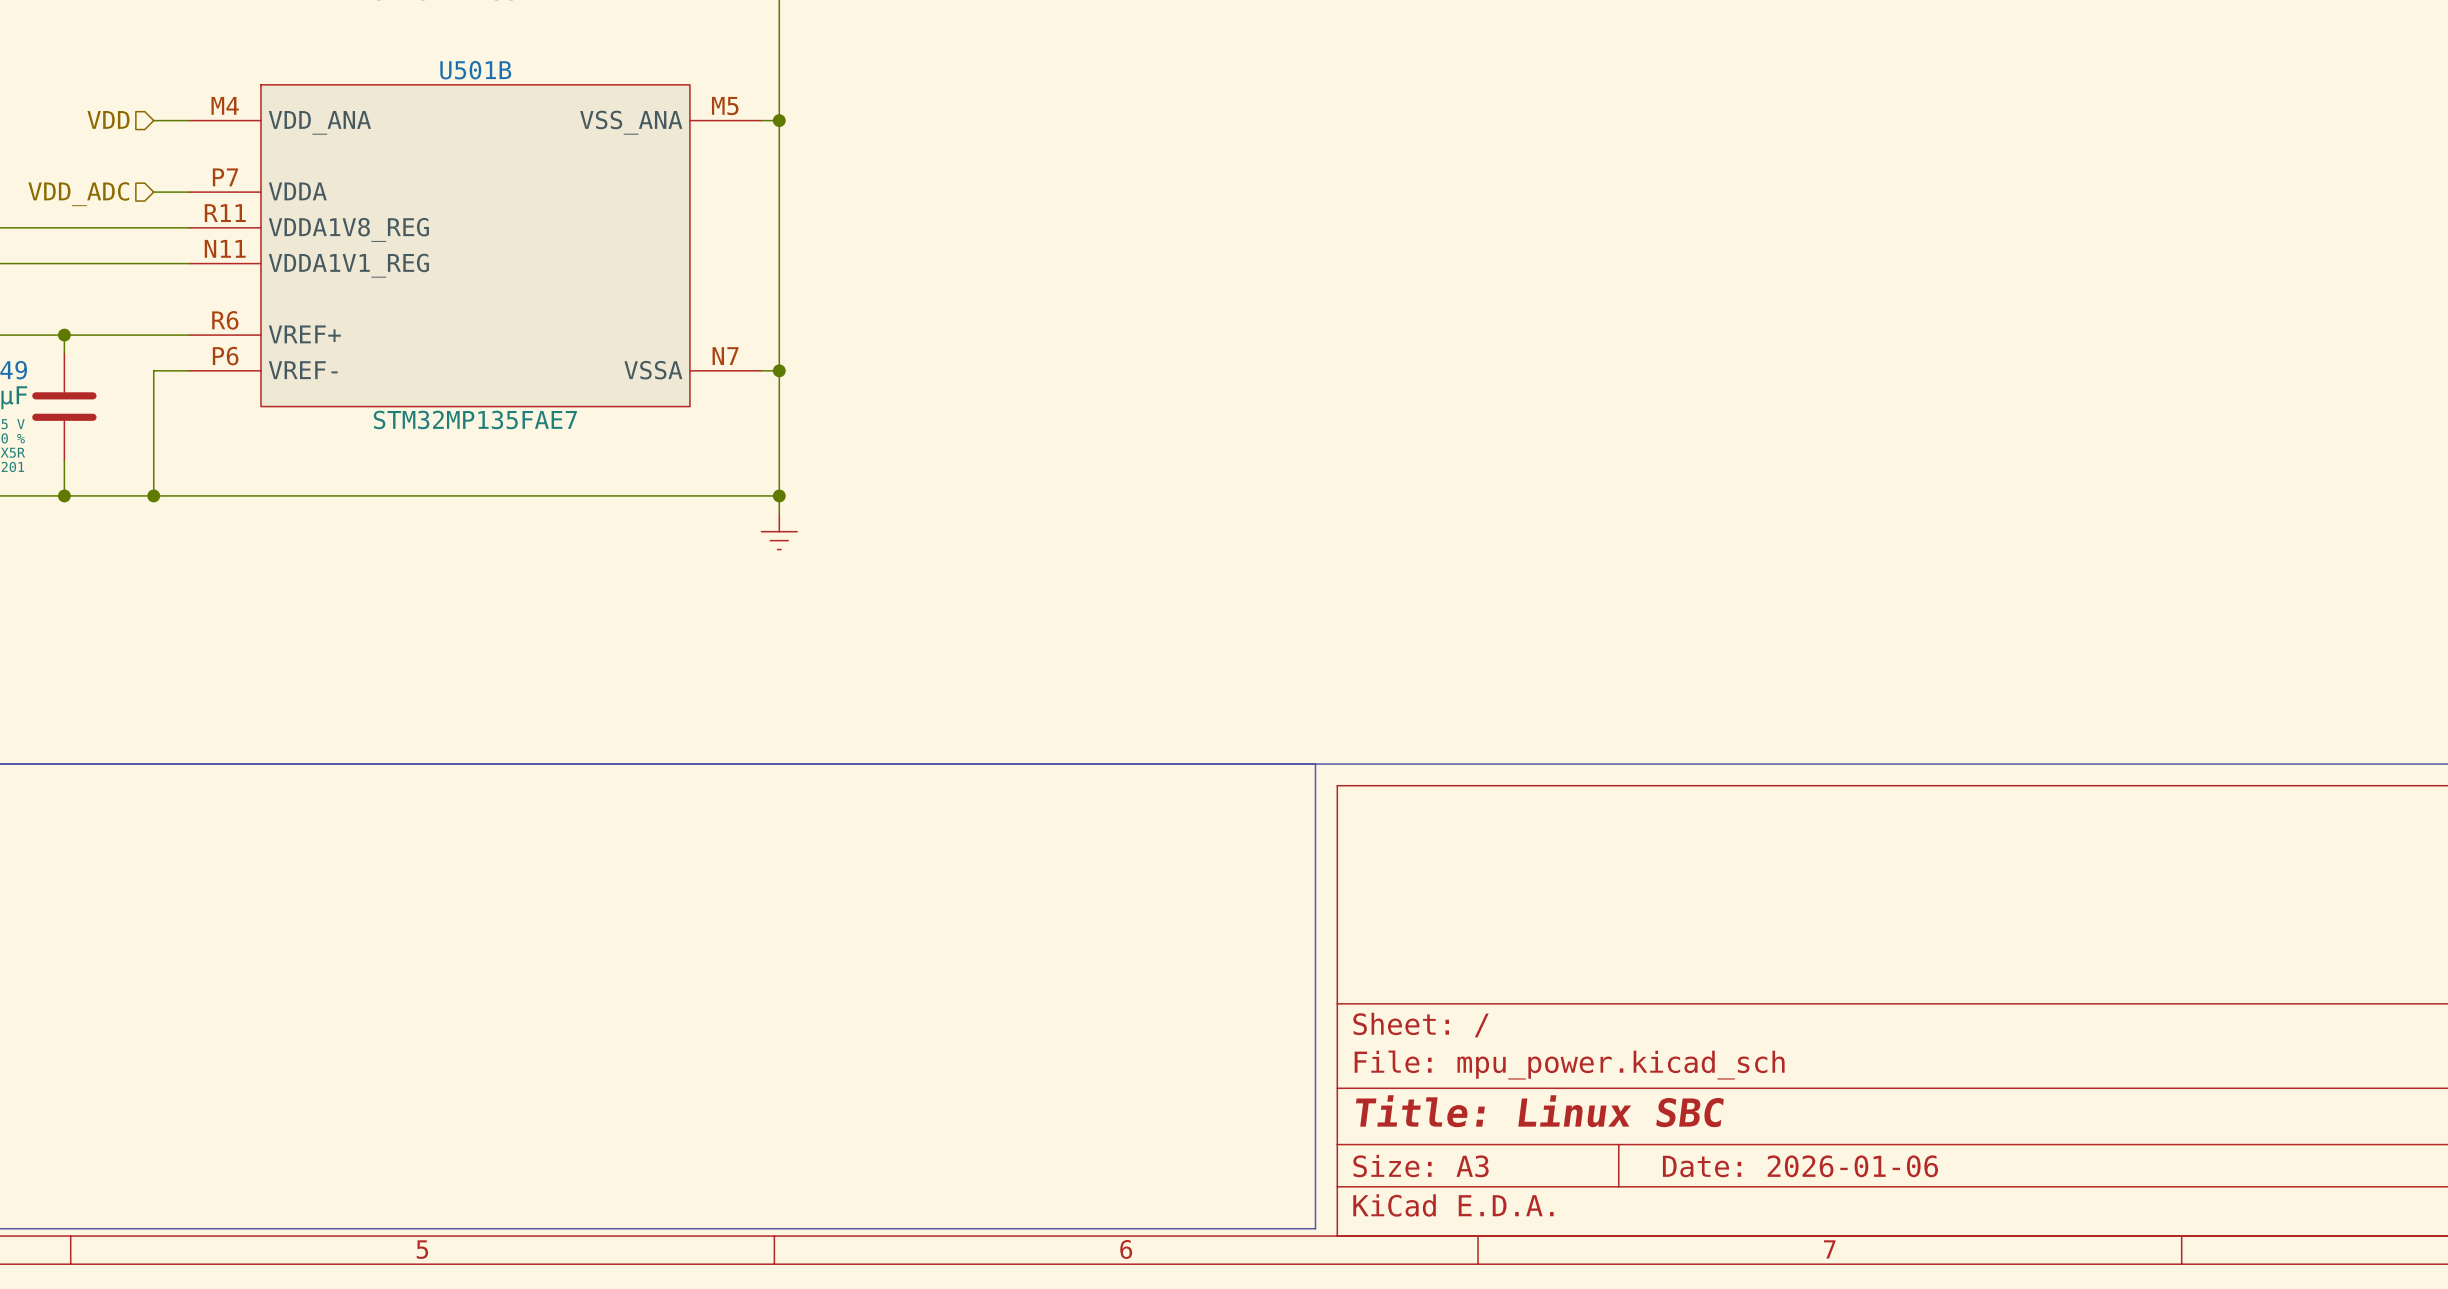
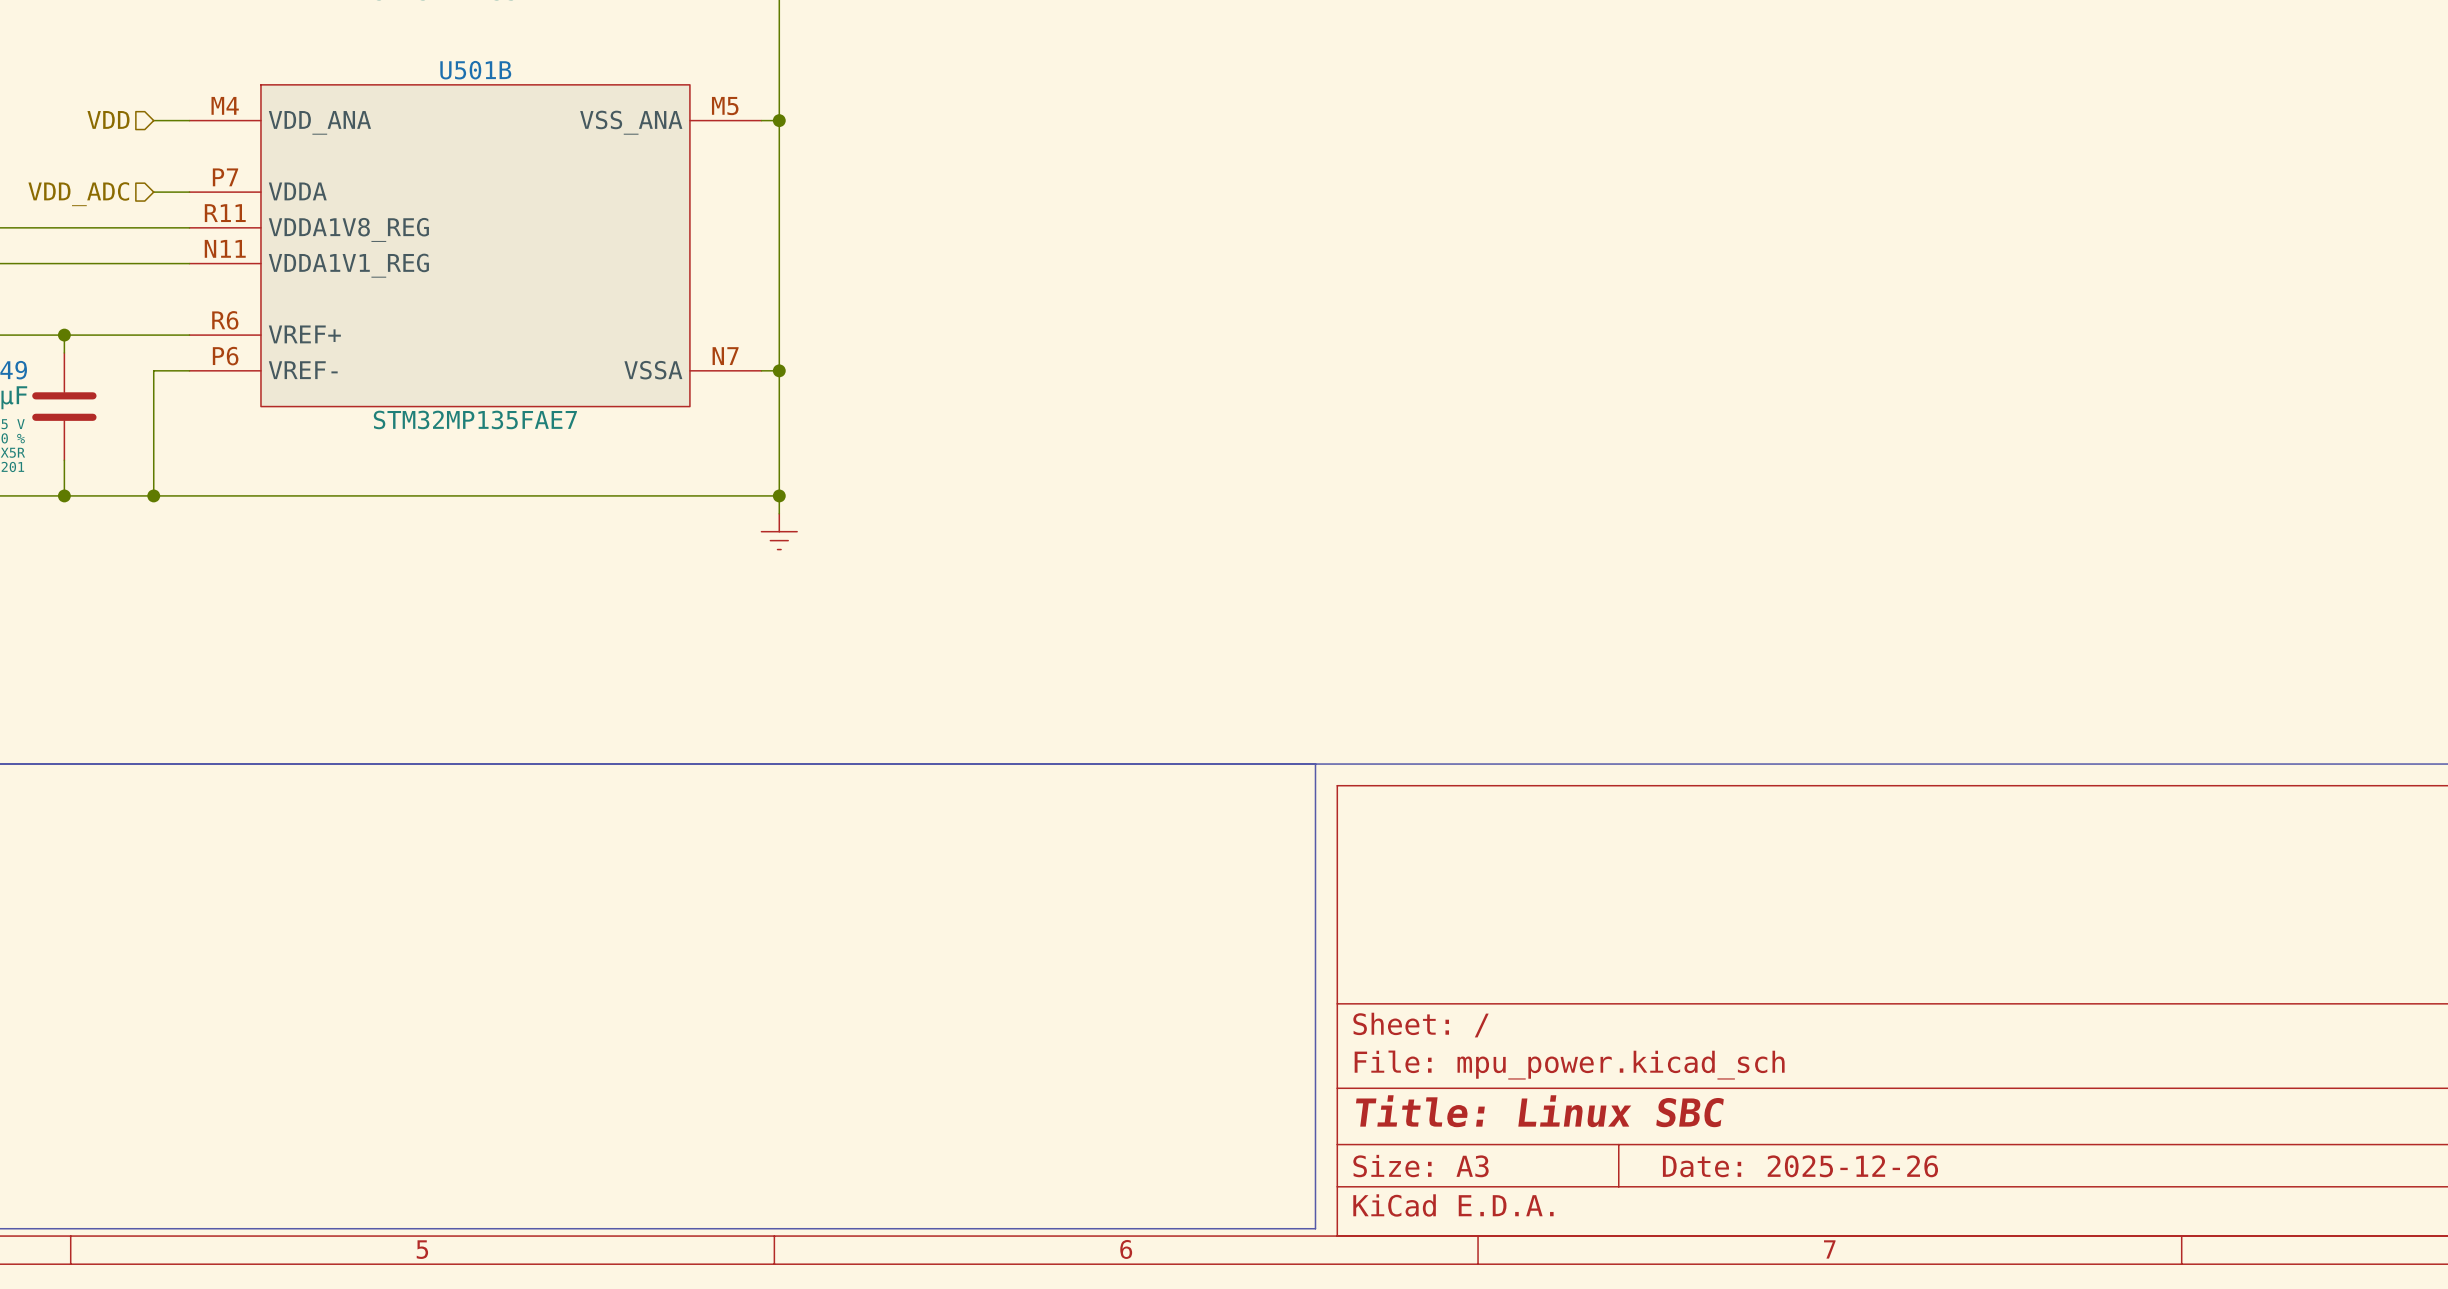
title block: Date: 2026-01-06 (1800, 1166) -> Date: 2025-12-26 (1800, 1166)

